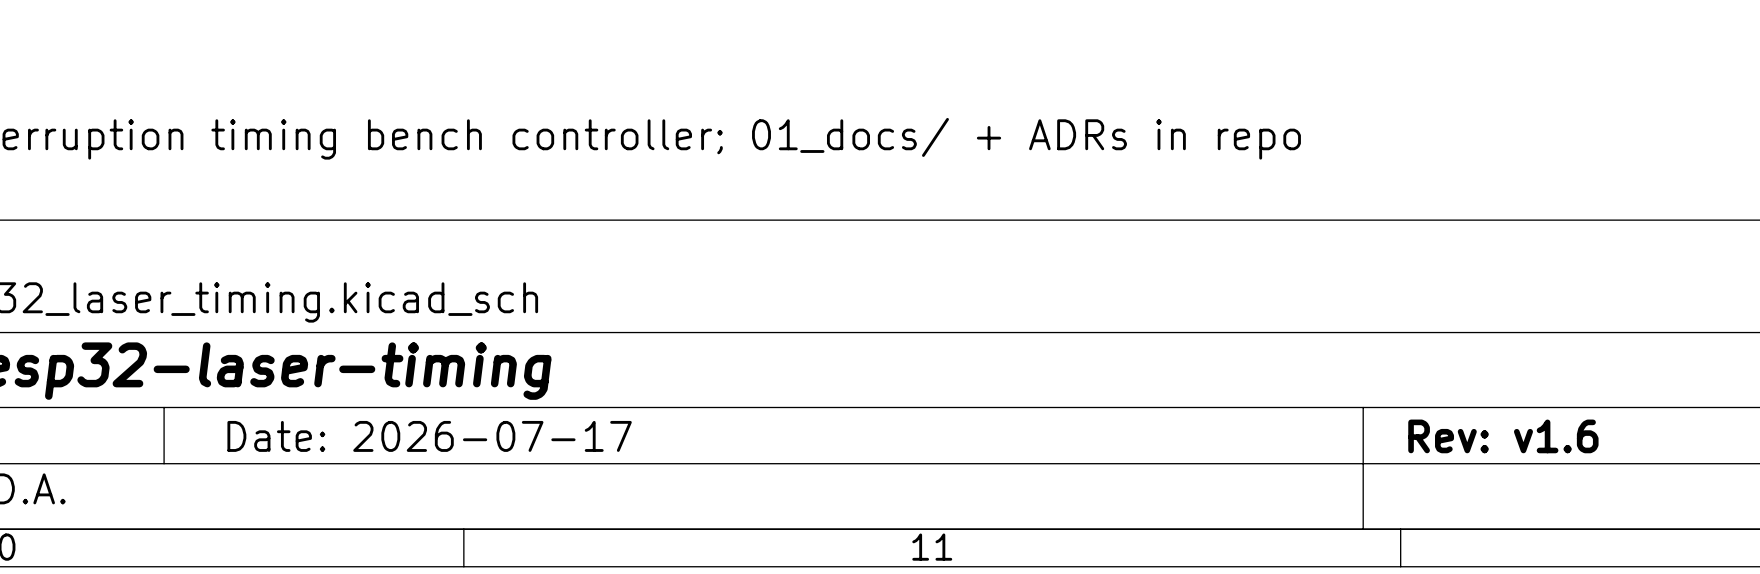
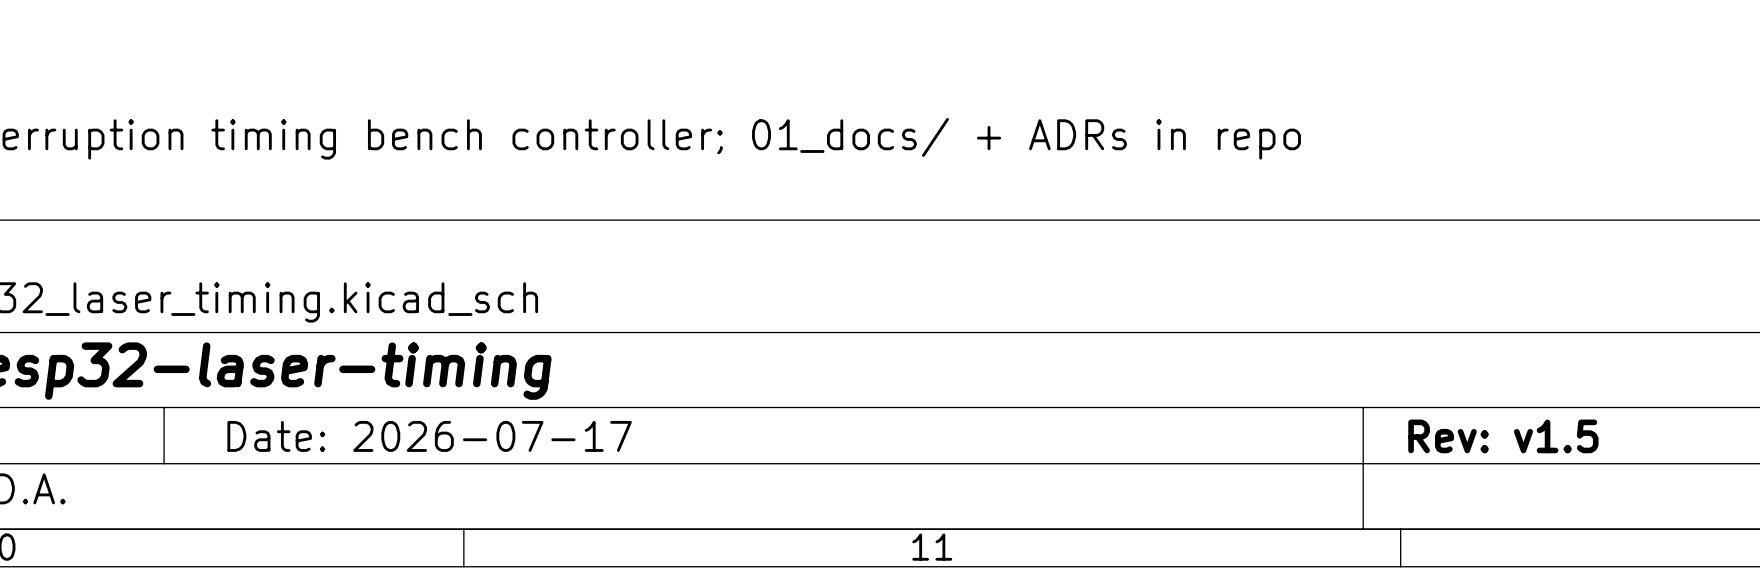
title block: Rev: v1.6 (1503, 436) -> Rev: v1.5 (1503, 436)

